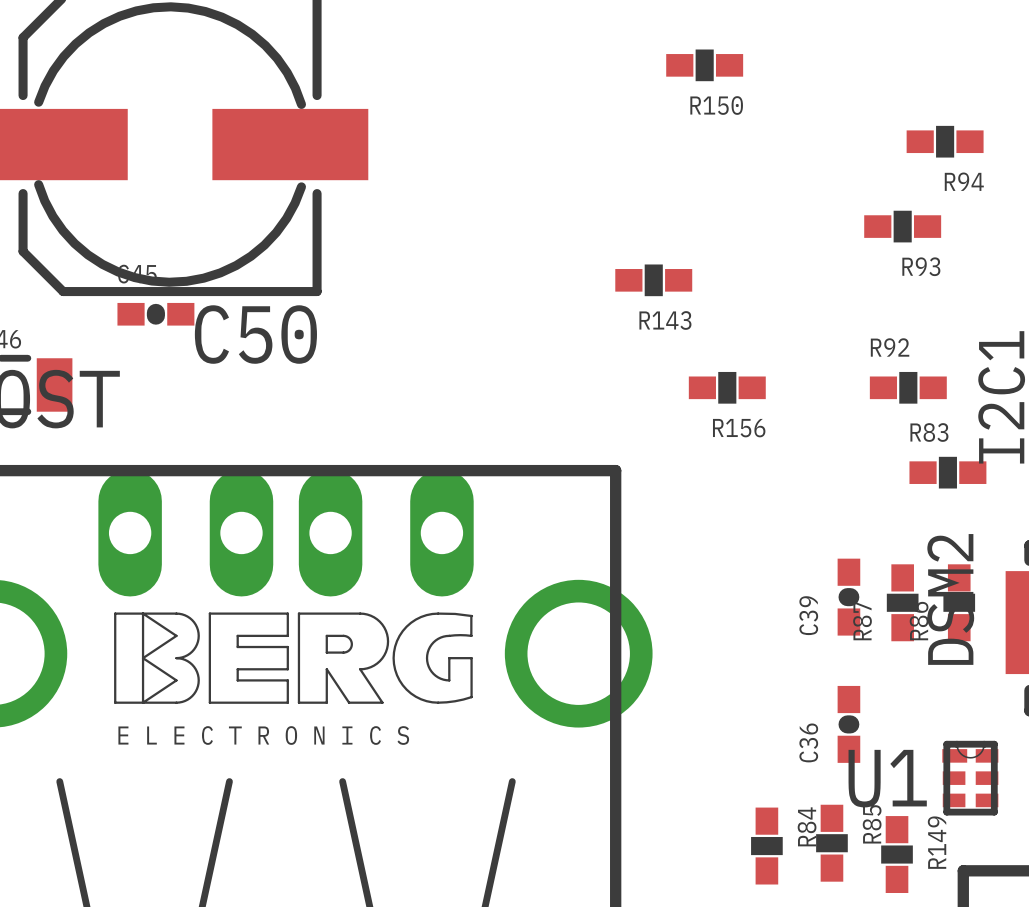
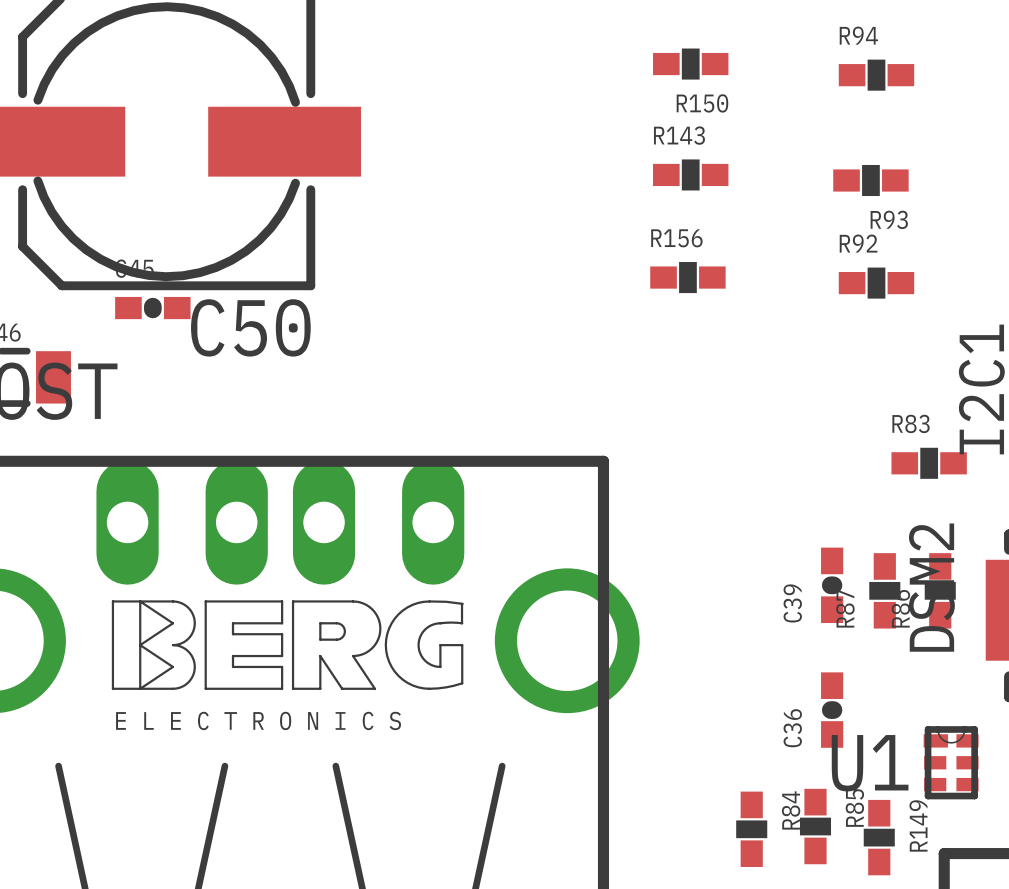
R94 position: (945, 141) -> (876, 75)
R94 name position: R94 (964, 181) -> R94 (858, 35)
R93 position: (902, 226) -> (870, 180)
R143 position: (653, 280) -> (690, 174)
R143 name position: R143 (665, 320) -> R143 (679, 135)
R156 position: (727, 387) -> (687, 277)
R92 position: (908, 387) -> (876, 283)
R156 name position: R156 (739, 428) -> R156 (676, 238)

